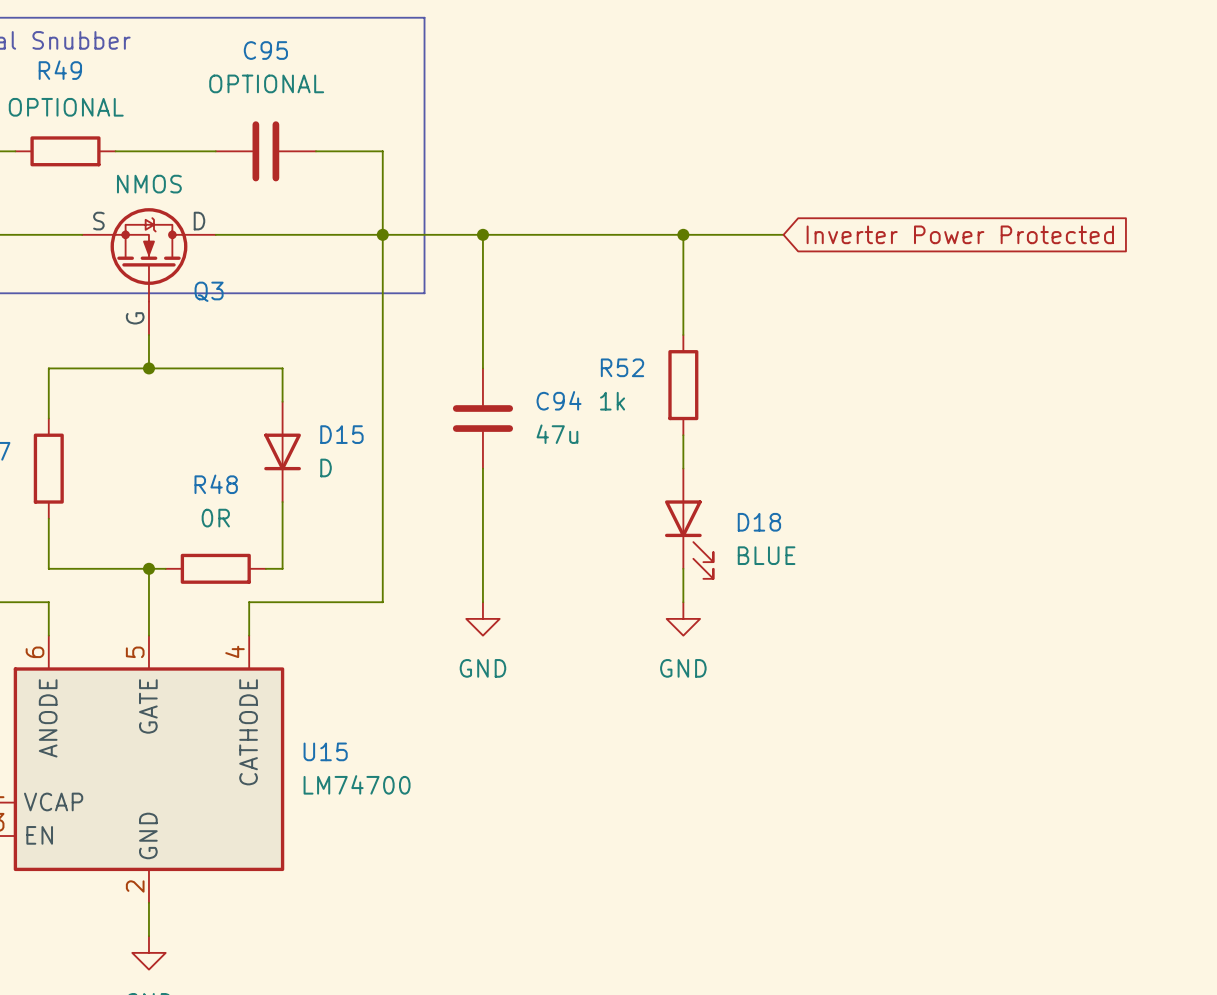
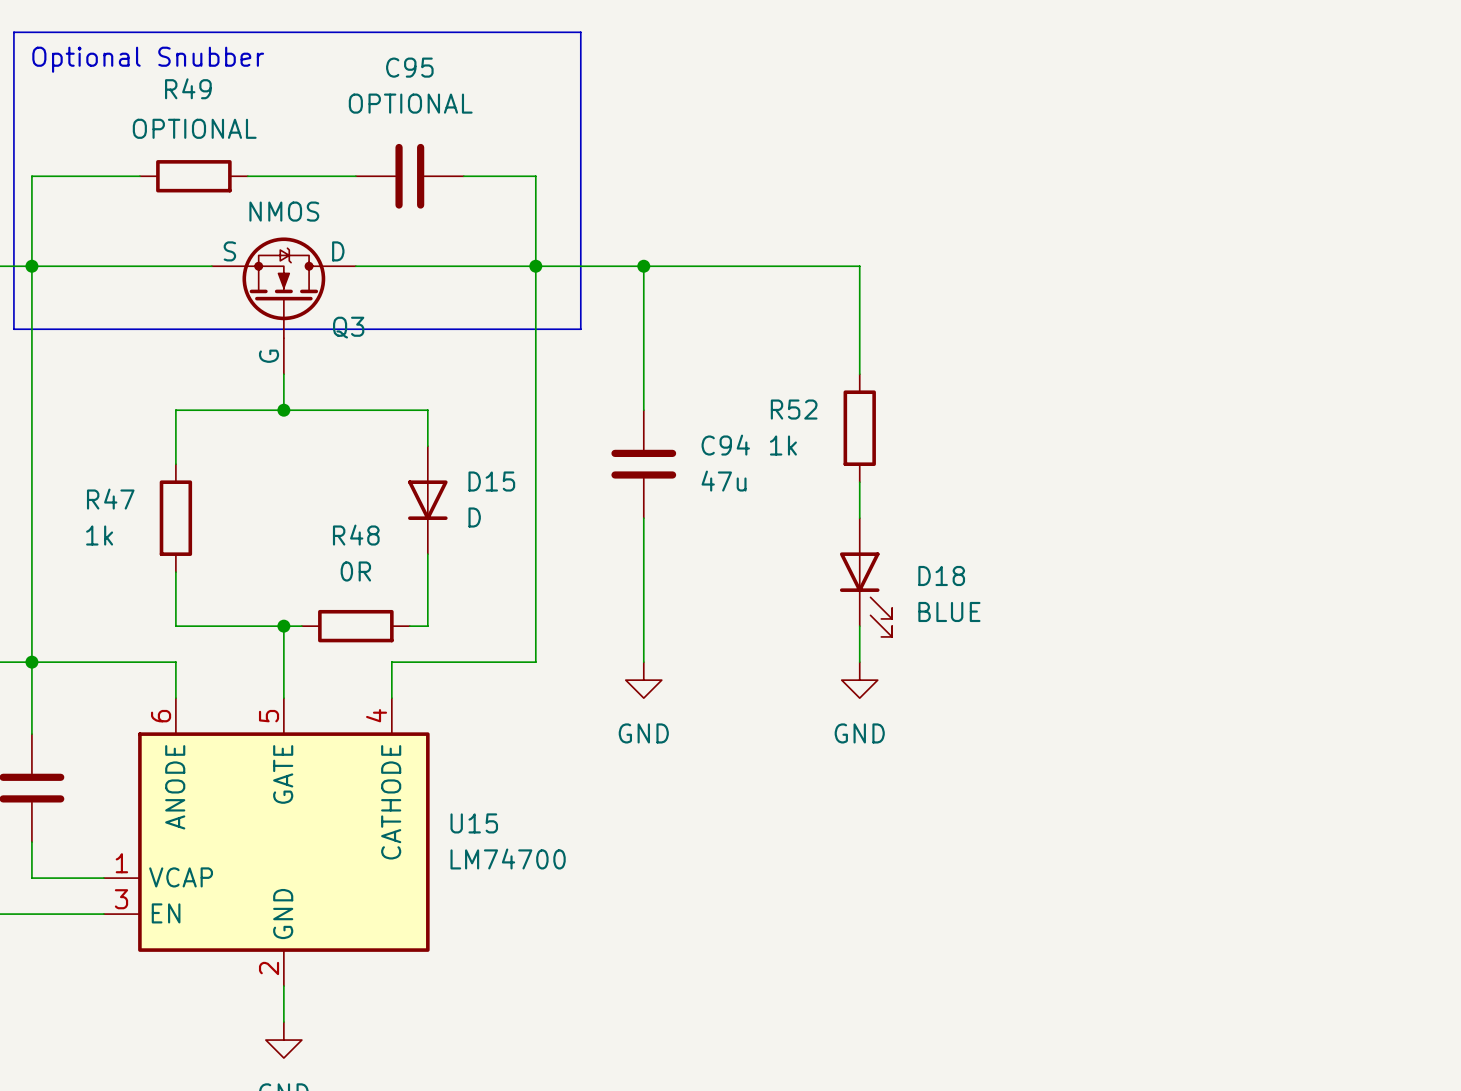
wire: (683, 234) (783, 234) -> none
junction: (683, 234) -> none
global label: Inverter Power Protected (960, 234) -> none

